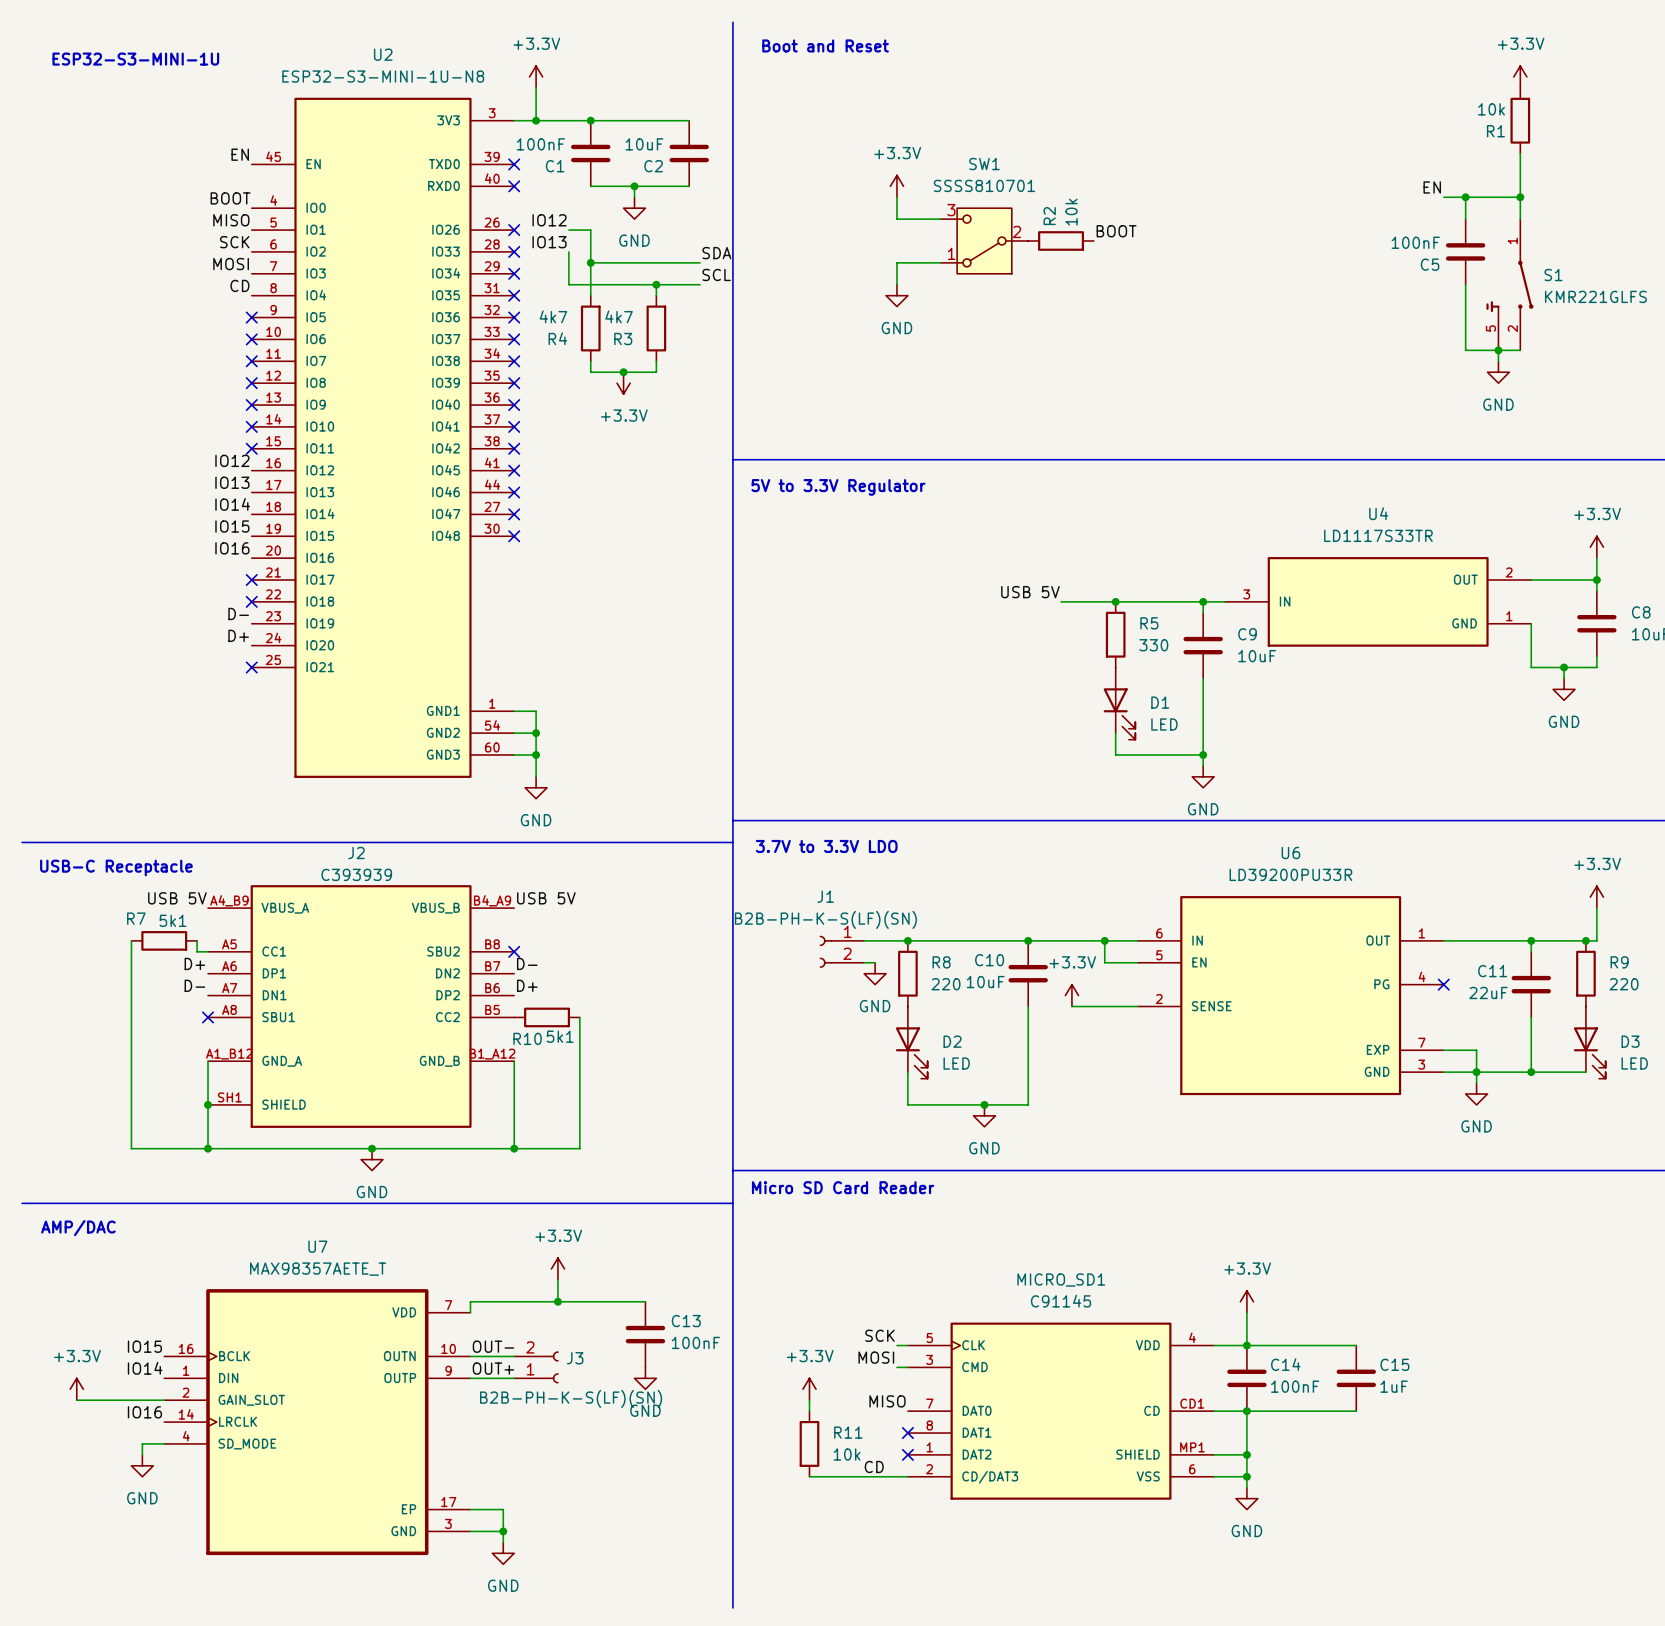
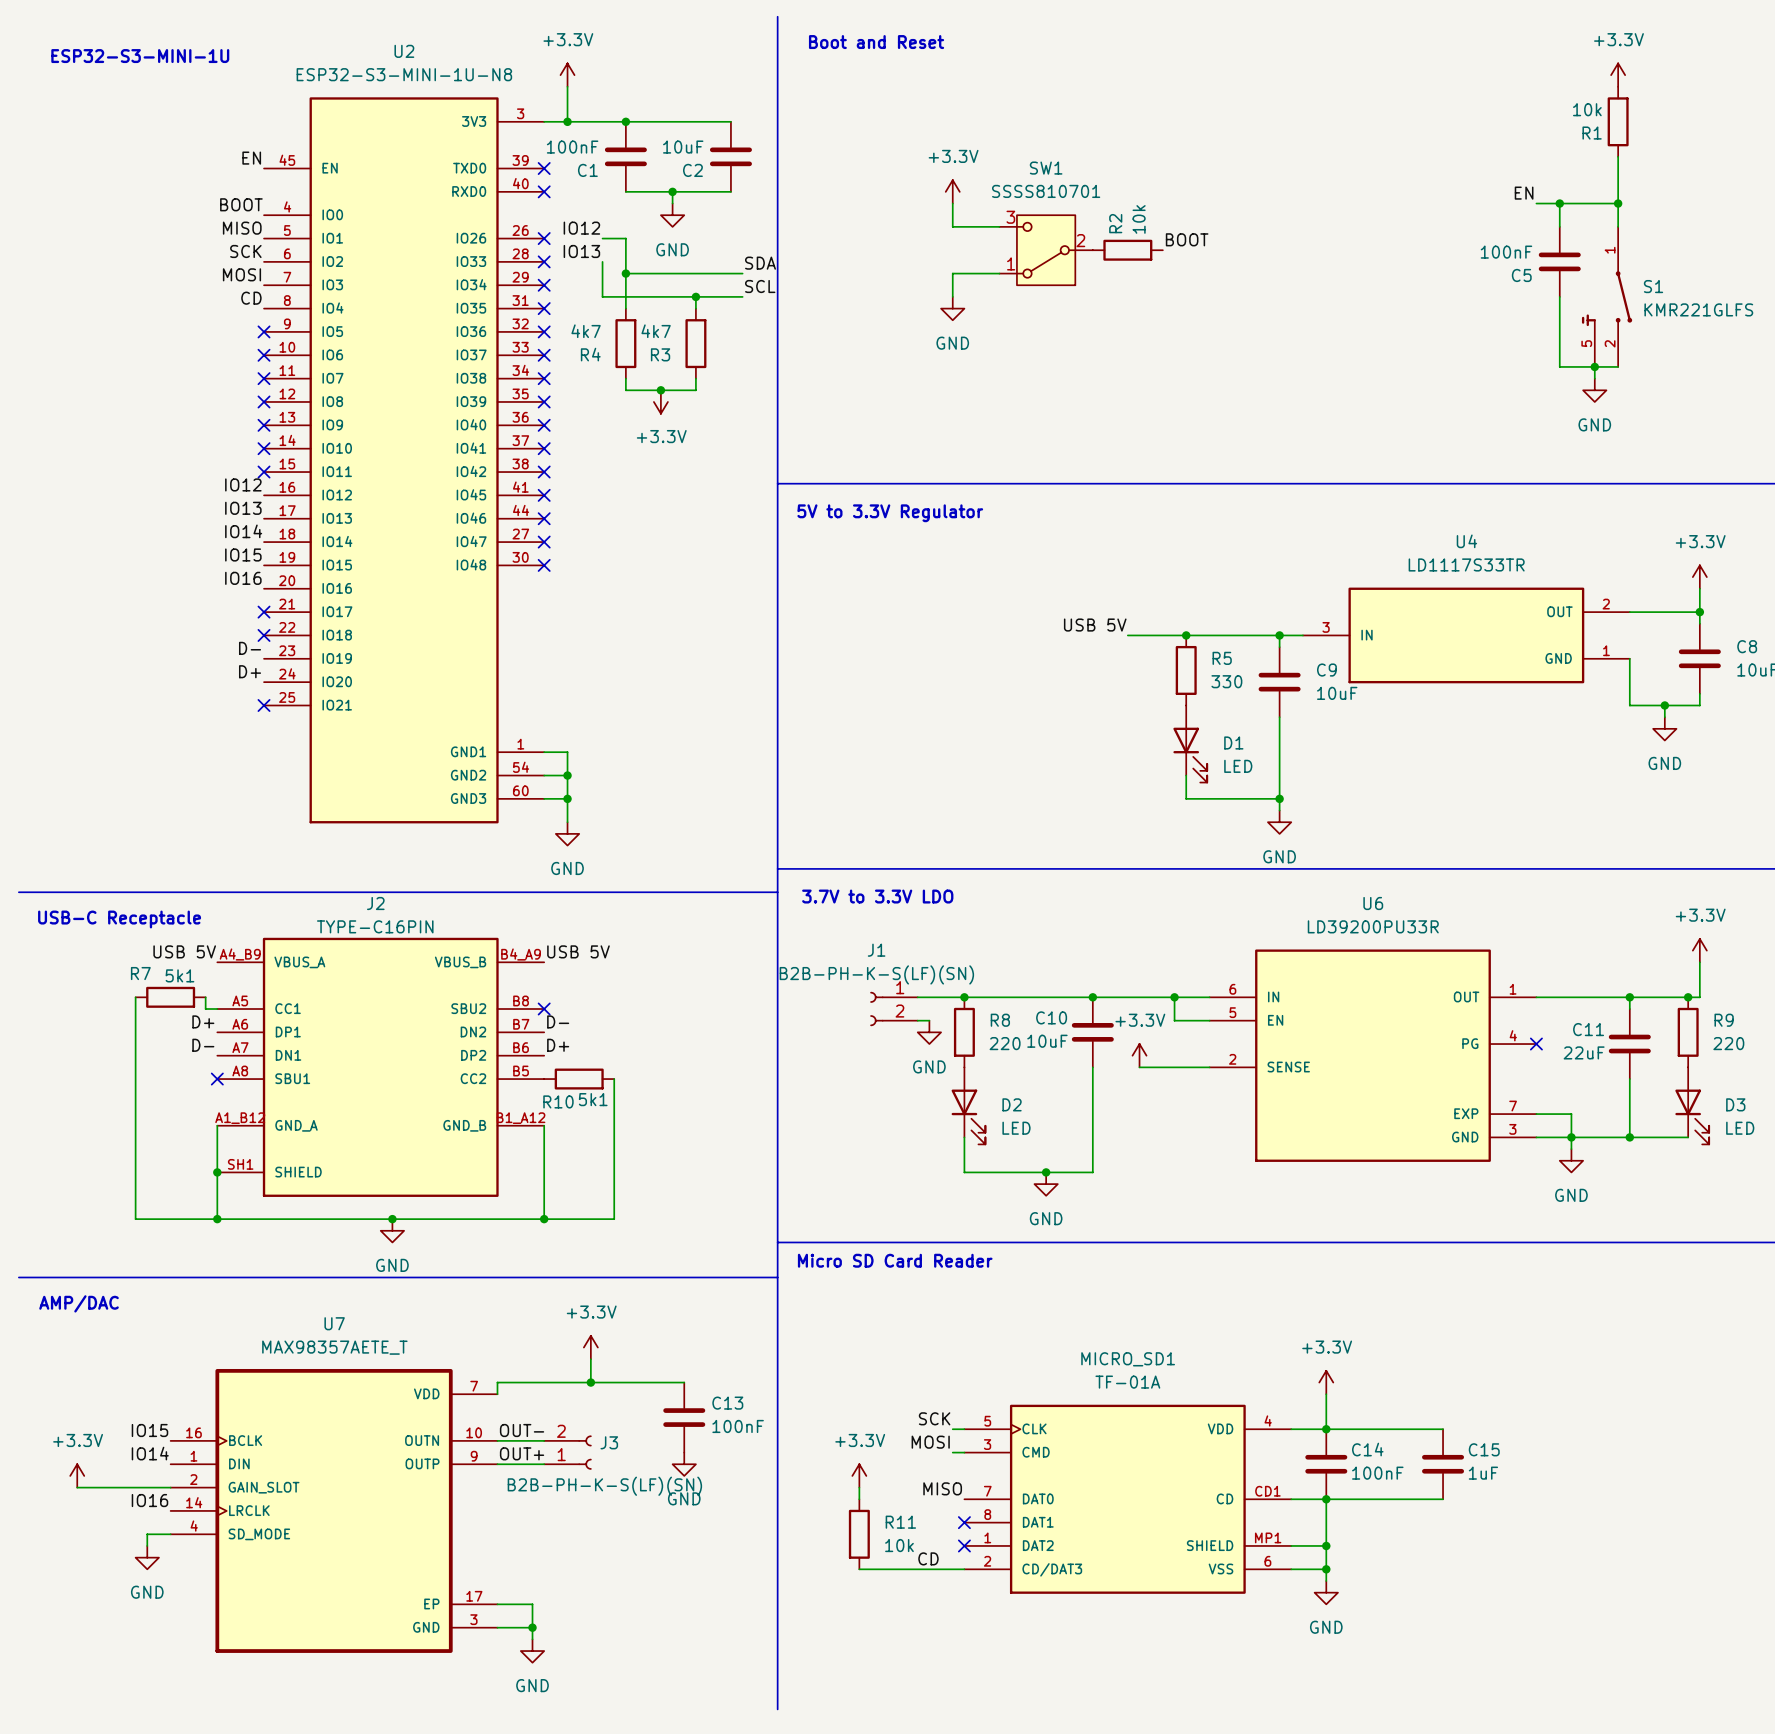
J2 value: C393939 (356, 874) -> TYPE-C16PIN (375, 926)
MICRO_SD1 value: C91145 (1061, 1301) -> TF-01A (1127, 1382)

